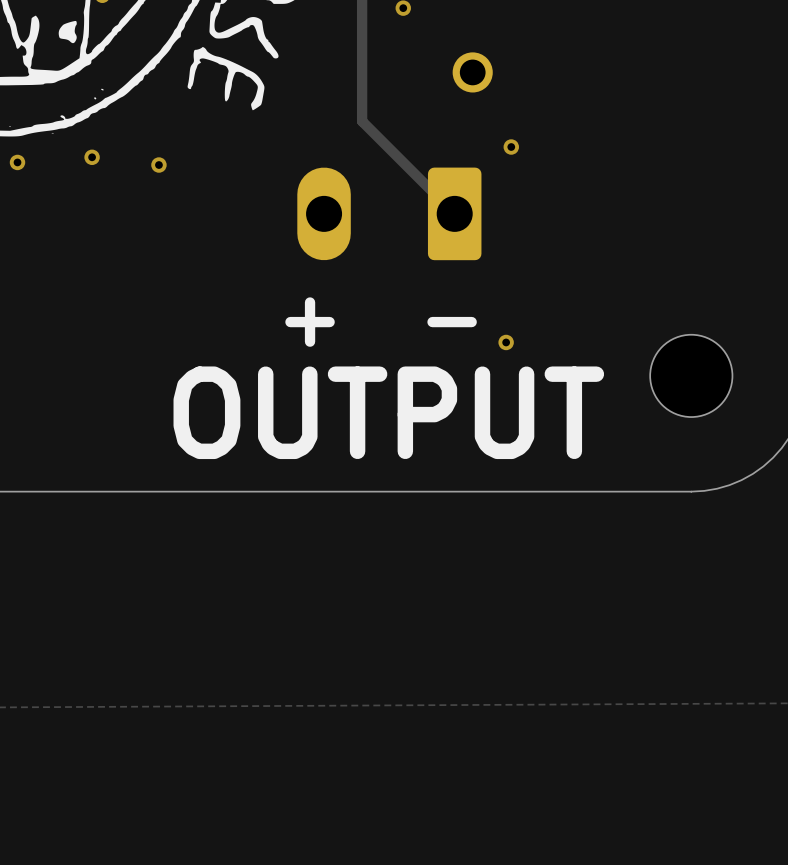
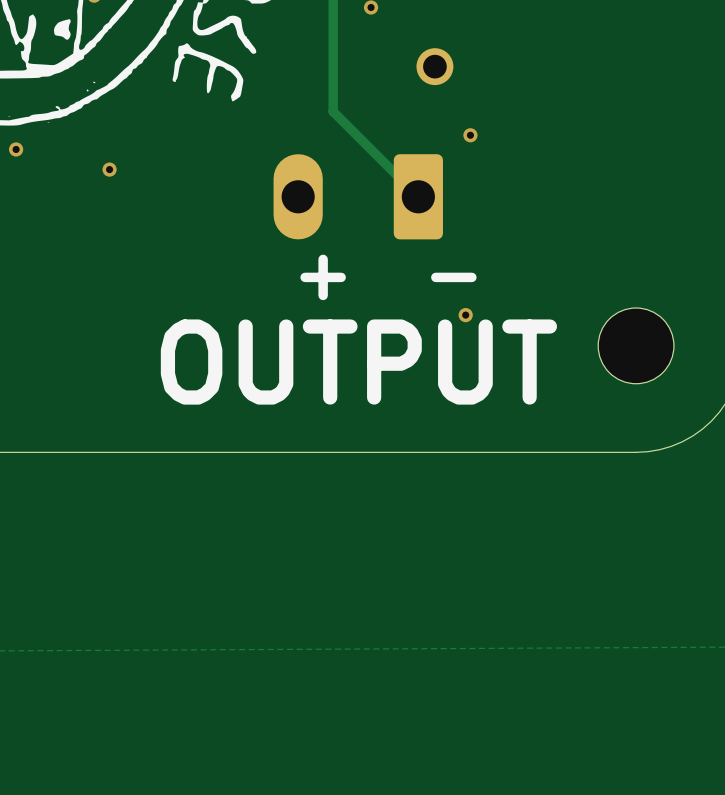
via: (92, 157) -> none
via: (158, 165) -> none
via: none -> (109, 169)
text position: - + (381, 322) -> - + (388, 277)
text position: OUTPUT (388, 412) -> OUTPUT (358, 362)

